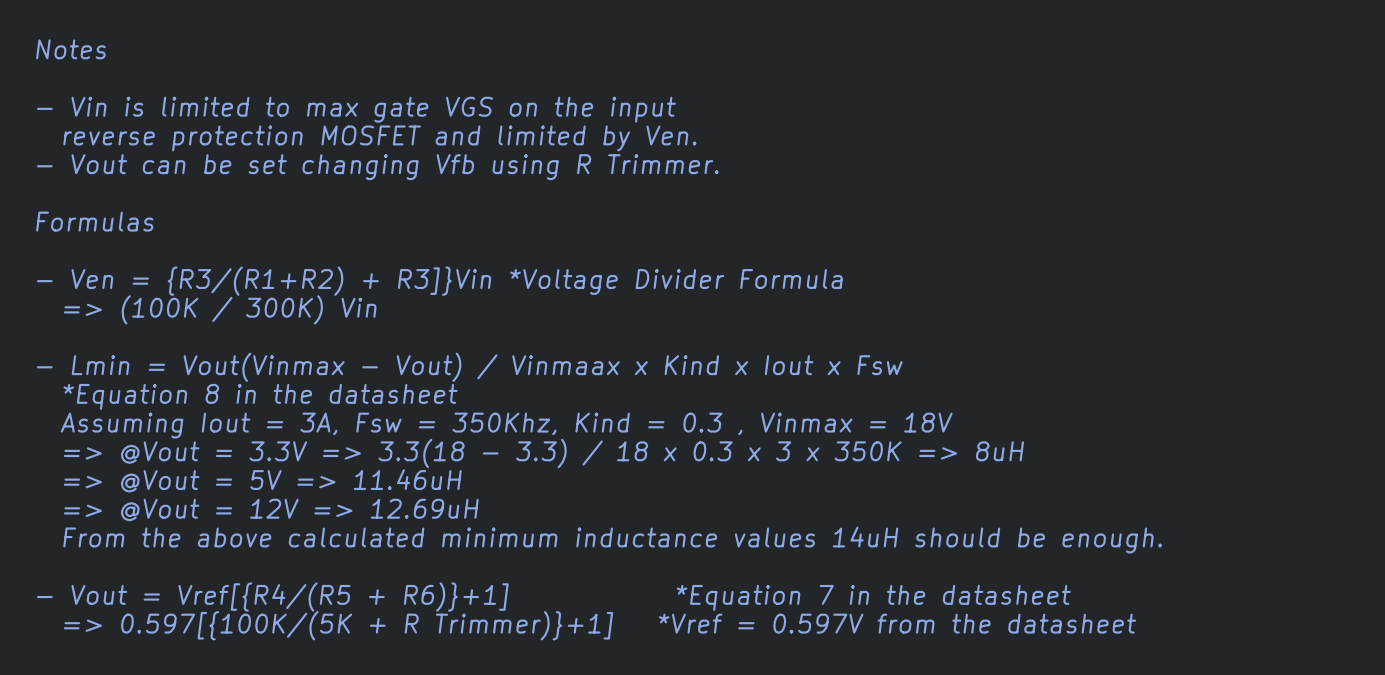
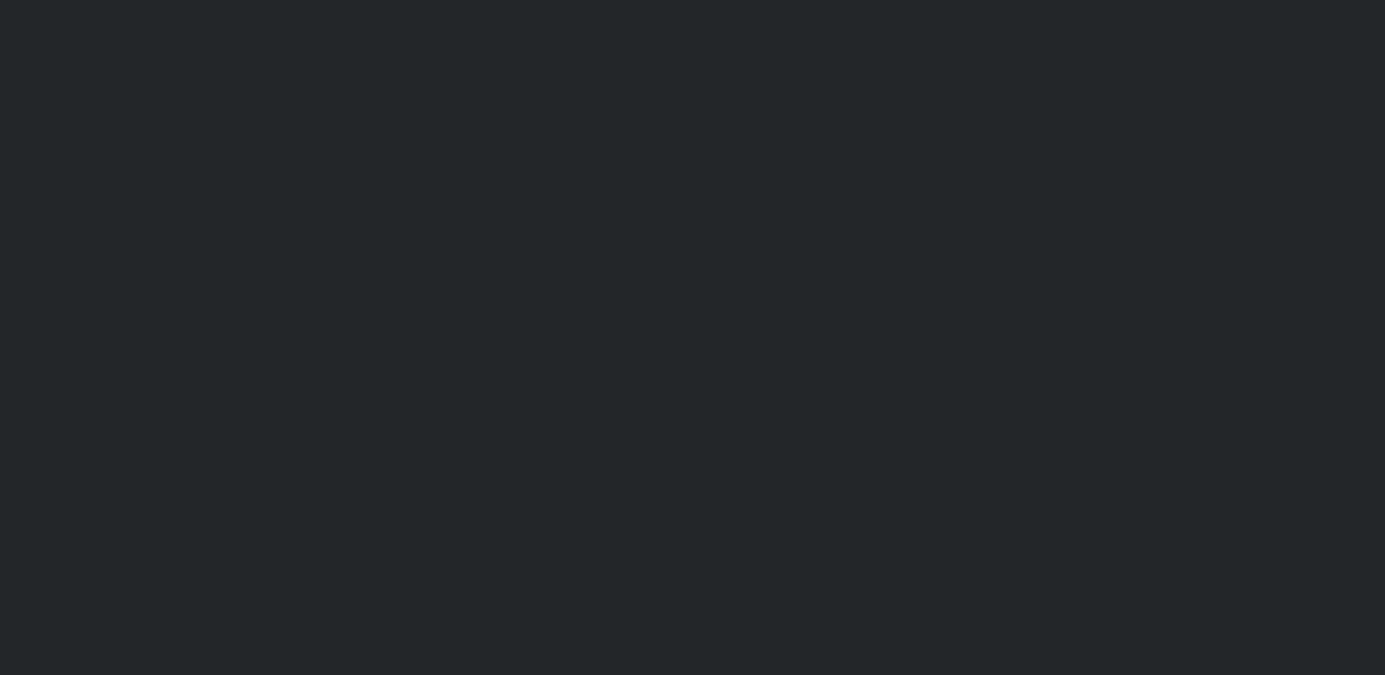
text: Notes (70, 49) -> none
text: - Vin is limited to max gate VGS on the input (356, 109) -> none
text: reverse protection MOSFET and limited by Ven. (379, 138) -> none
text: - Vout can be set changing Vfb using R Trimmer. (377, 167) -> none
text: Formulas (94, 221) -> none
text: - Ven = {R3/(R1+R2) + R3]}Vin *Voltage Divider Formula (439, 281) -> none
text: => (100K / 300K) Vin (220, 309) -> none
text: - Lmin = Vout(Vinmax - Vout) / Vinmaax x Kind x Iout x Fsw (469, 367) -> none
text: *Equation 8 in the datasheet (260, 396) -> none
text: Assuming Iout = 3A, Fsw = 350Khz, Kind = 0.3 , Vinmax = 18V (506, 425) -> none
text: => @Vout = 3.3V => 3.3(18 - 3.3) / 18 x 0.3 x 3 x 350K => 8uH (543, 453) -> none
text: => @Vout = 5V => 11.46uH (262, 480) -> none
text: => @Vout = 12V => 12.69uH (271, 510) -> none
text: From the above calculated minimum inductance values 14uH should be enough. (612, 540) -> none
text: - Vout = Vref[{R4/(R5 + R6)}+1] *Equation 7 in the datasheet (553, 597) -> none
text: => 0.597[{100K/(5K + R Trimmer)}+1] *Vref = 0.597V from the datasheet (600, 625) -> none

